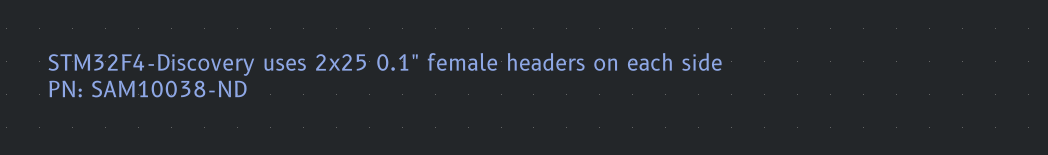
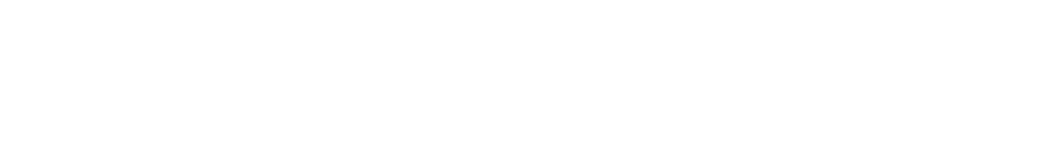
text: STM32F4-Discovery uses 2x25 0.1" female headers on each side (385, 64) -> none
text: PN: SAM10038-ND (147, 89) -> none

